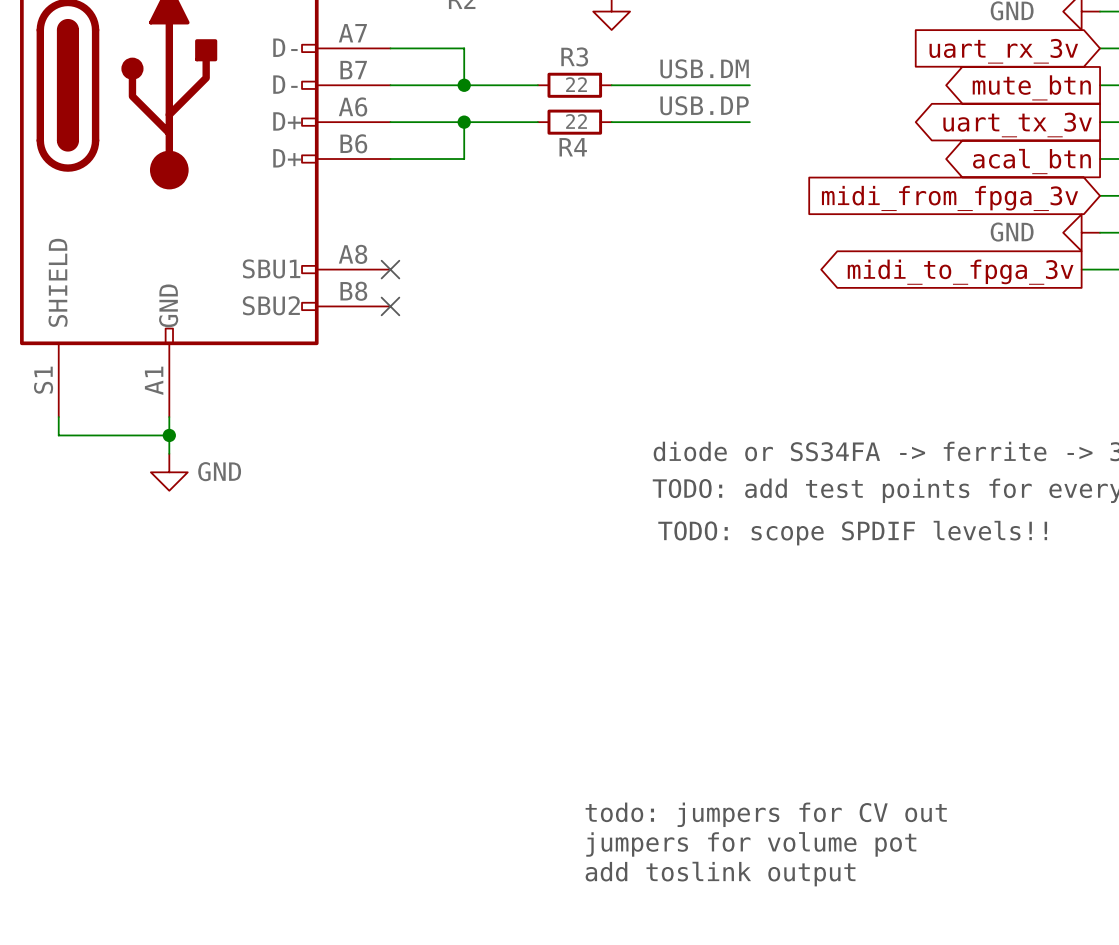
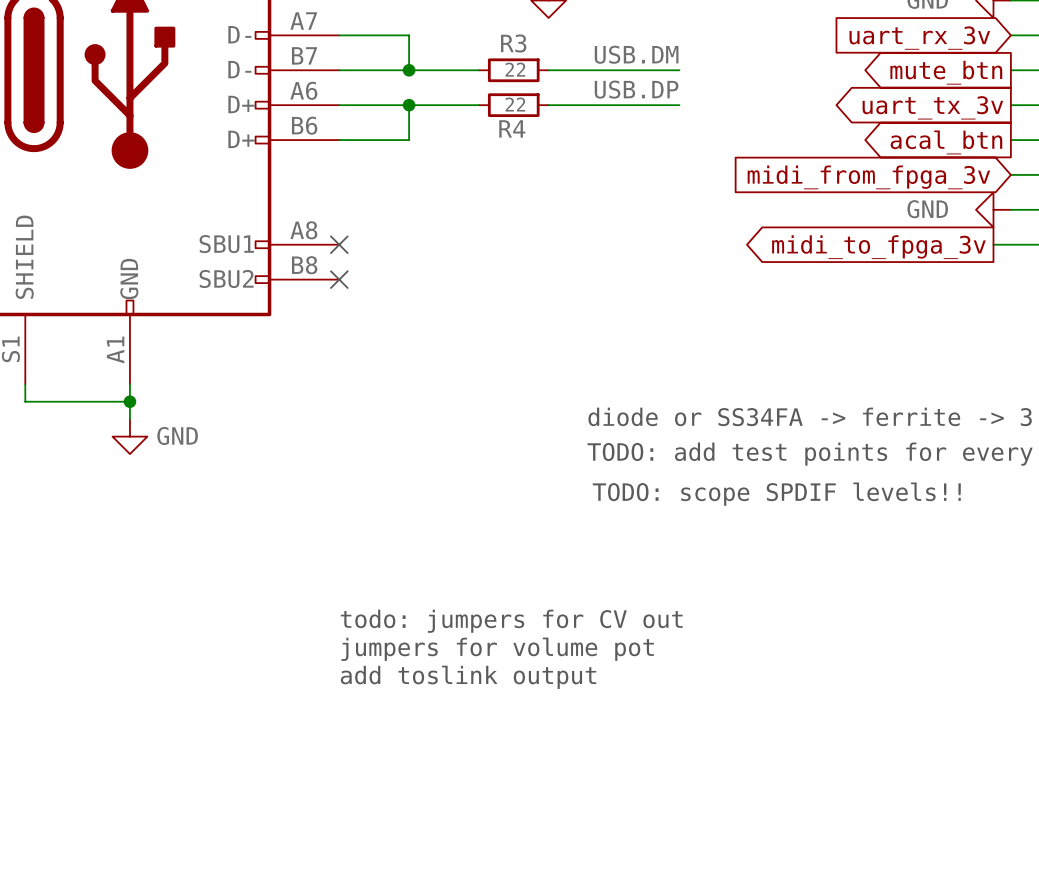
text position: todo: jumpers for CV out (766, 814) -> todo: jumpers for CV out (511, 621)
text position: jumpers for volume pot (751, 844) -> jumpers for volume pot (497, 649)
text position: add toslink output (720, 874) -> add toslink output (468, 677)

